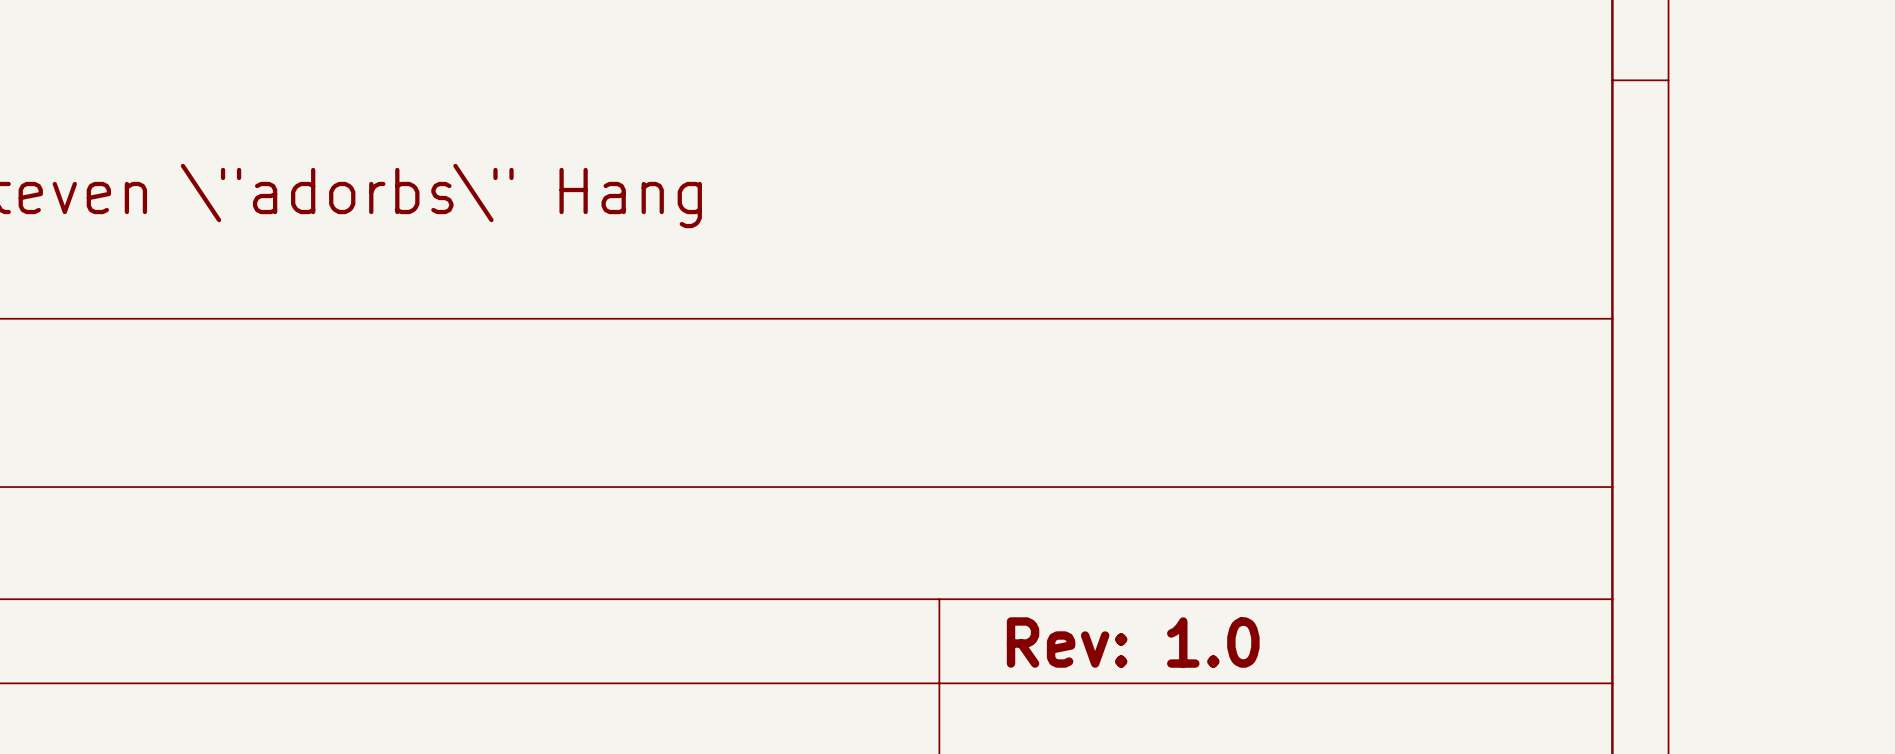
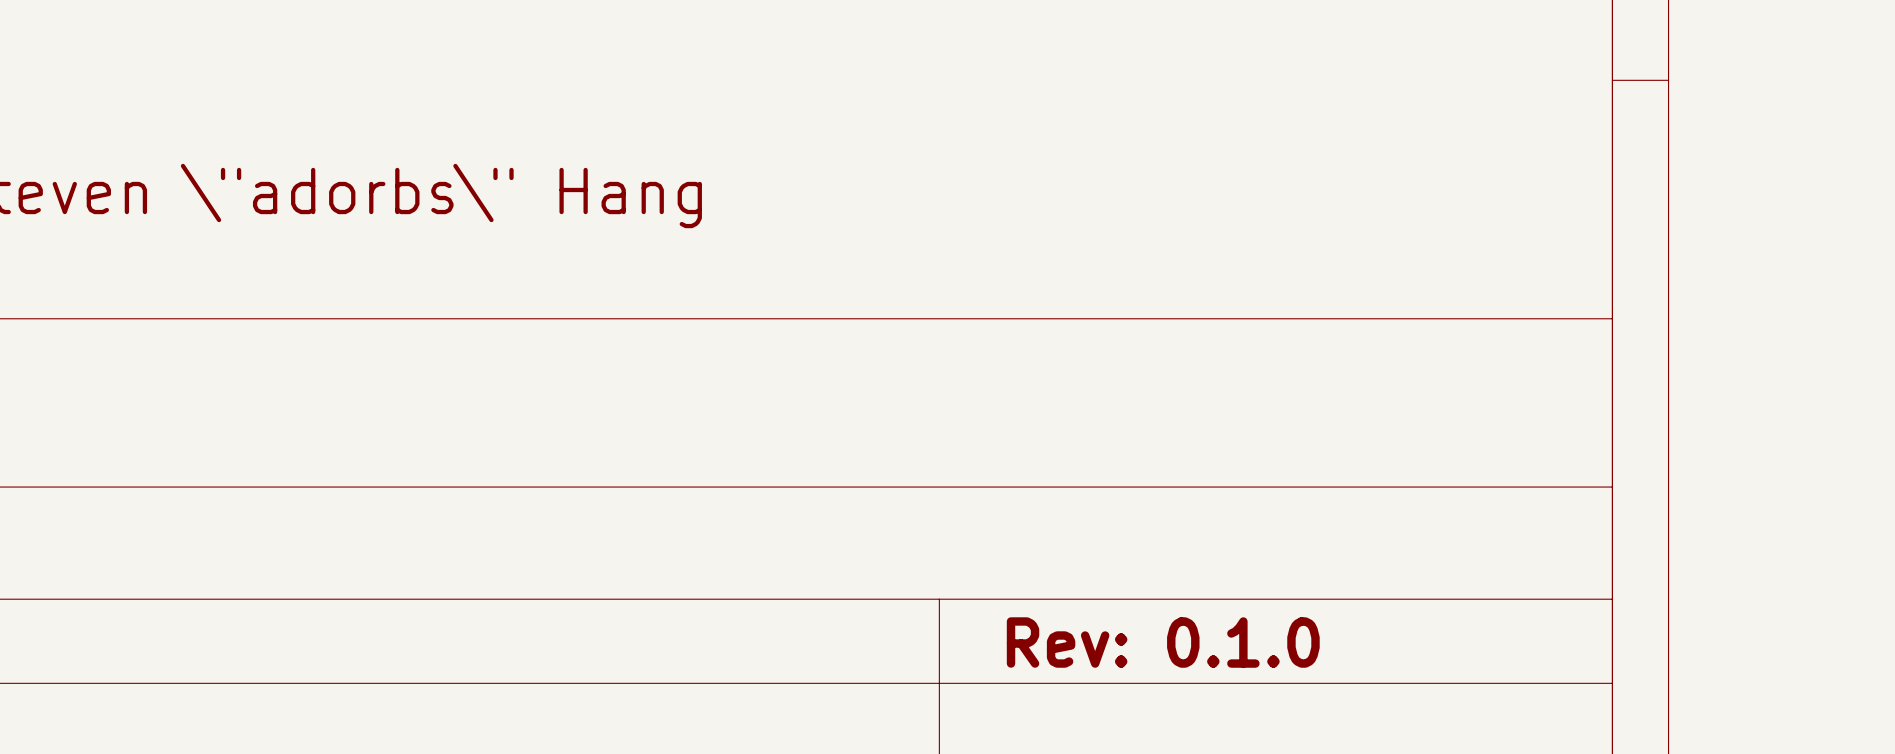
title block: Rev: 1.0 (1133, 642) -> Rev: 0.1.0 (1163, 642)

